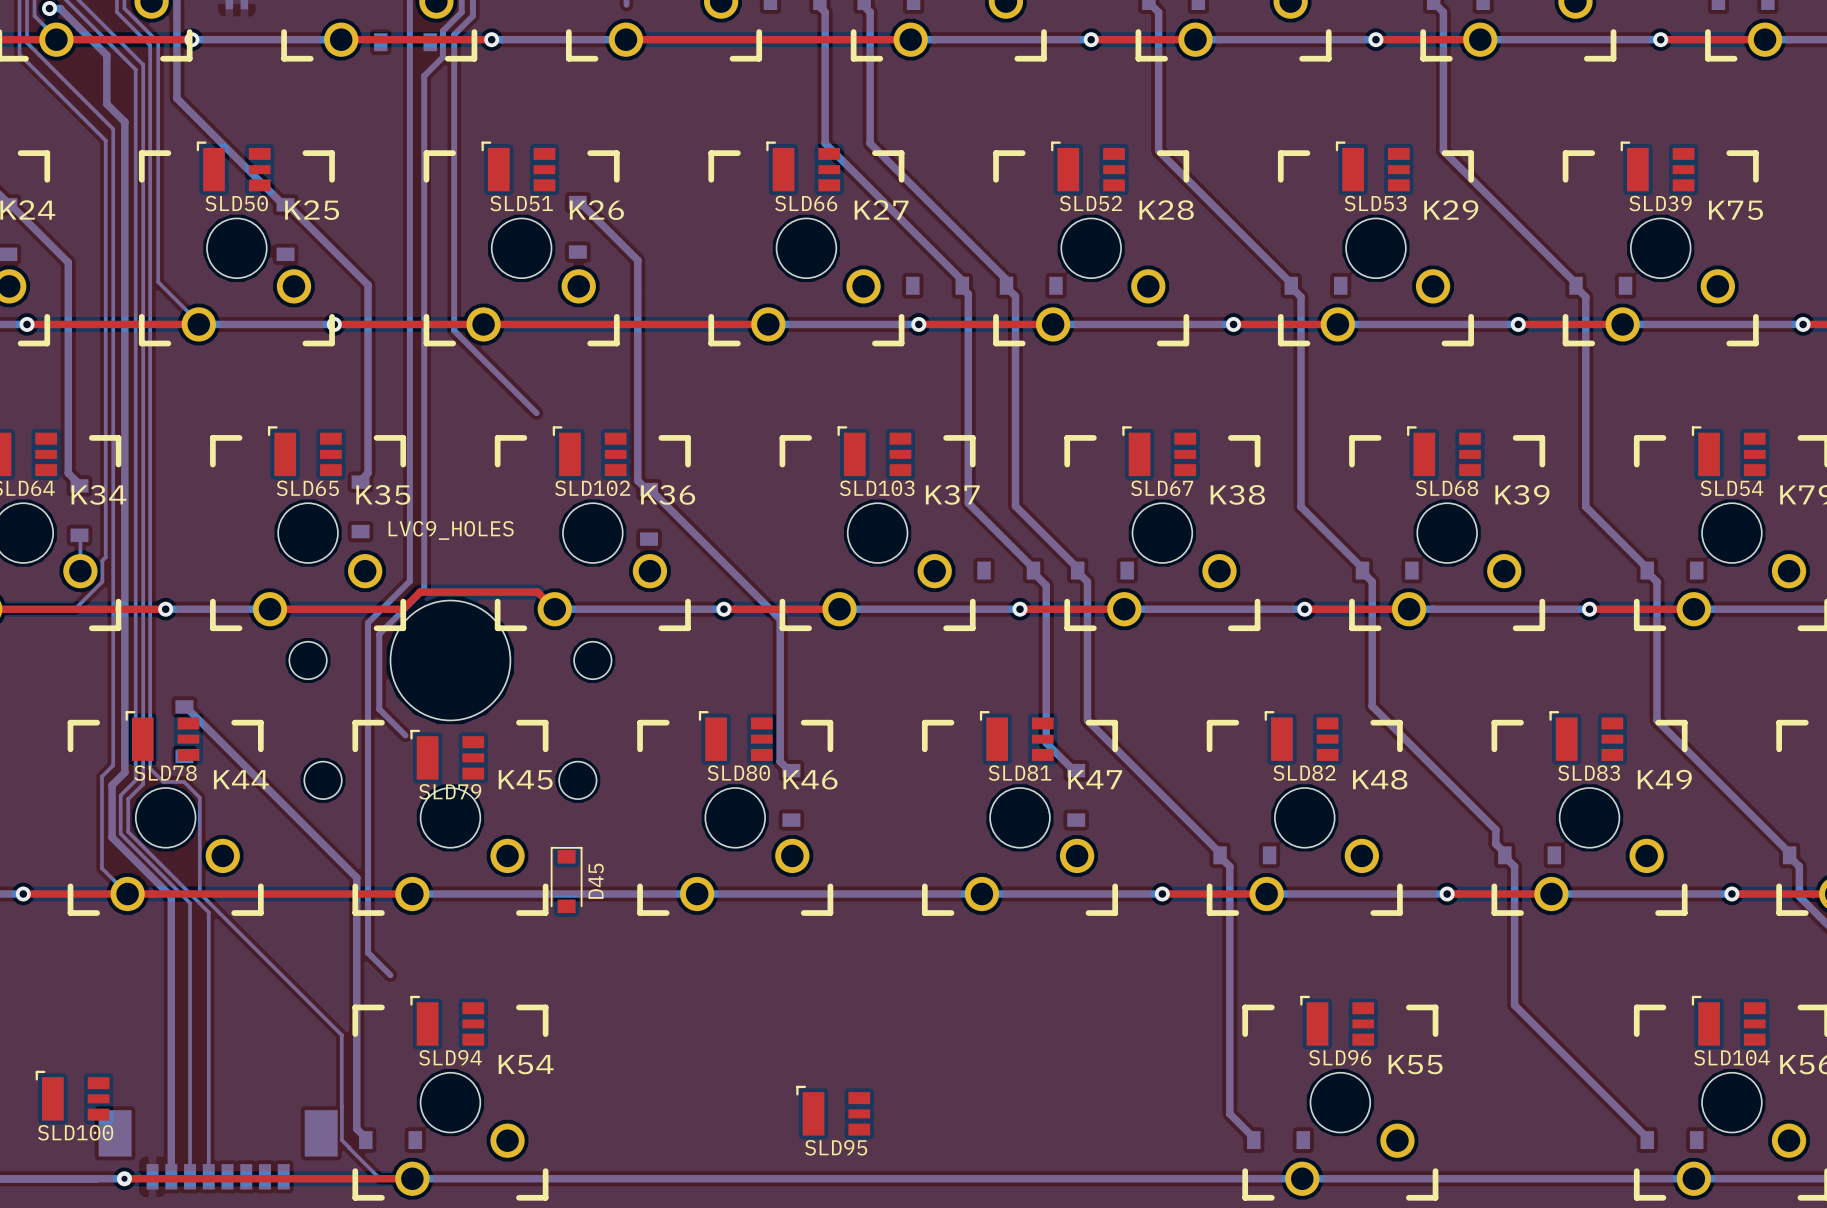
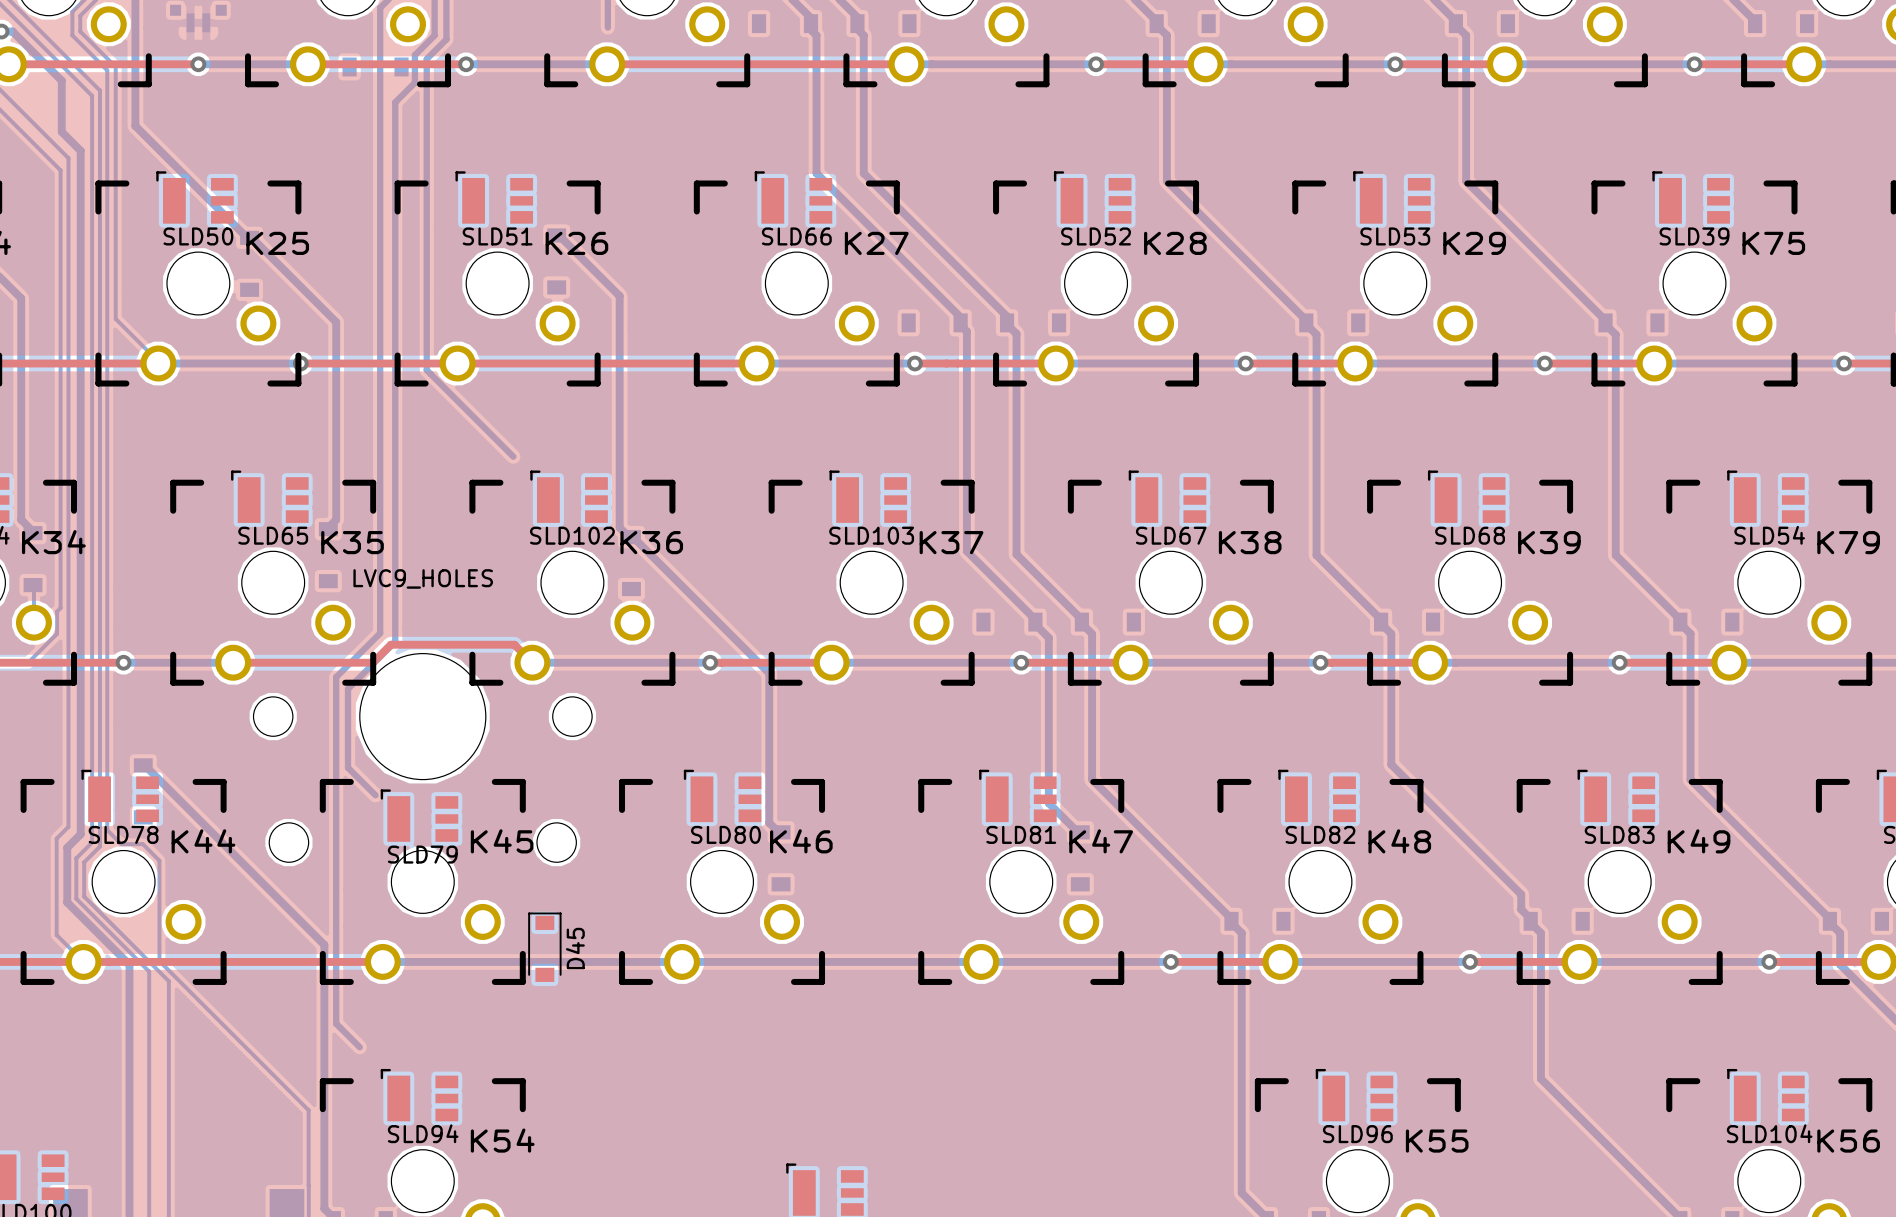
bottom track: (191, 39) (236, 39) -> none
top track: none -> (151, 64) (198, 64)
via position: (191, 39) -> (198, 64)

